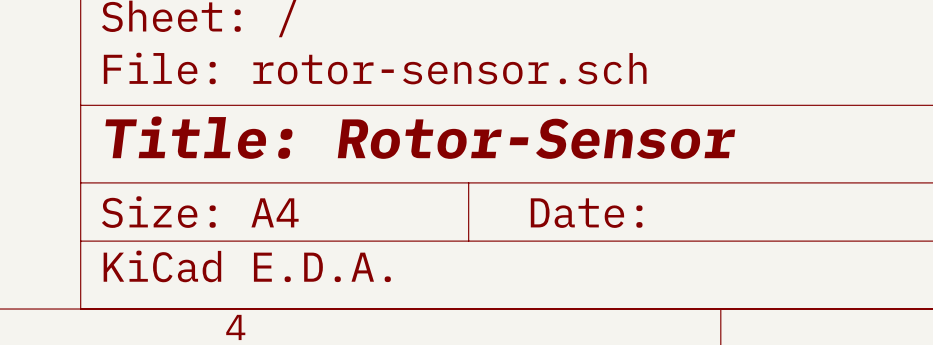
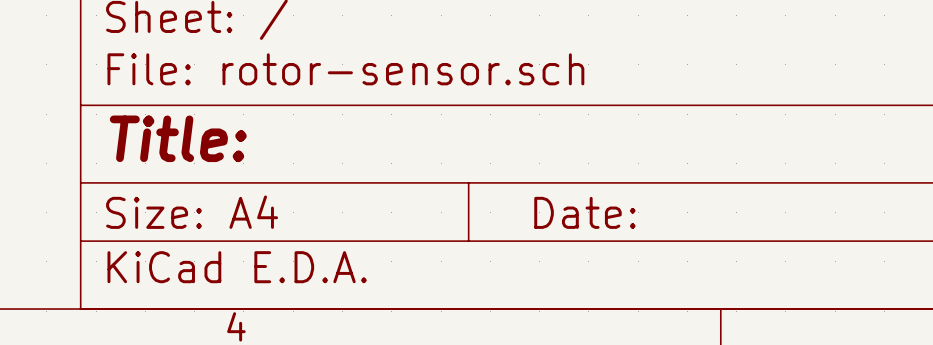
title block: Title: Rotor-Sensor (420, 137) -> Title: (178, 138)

